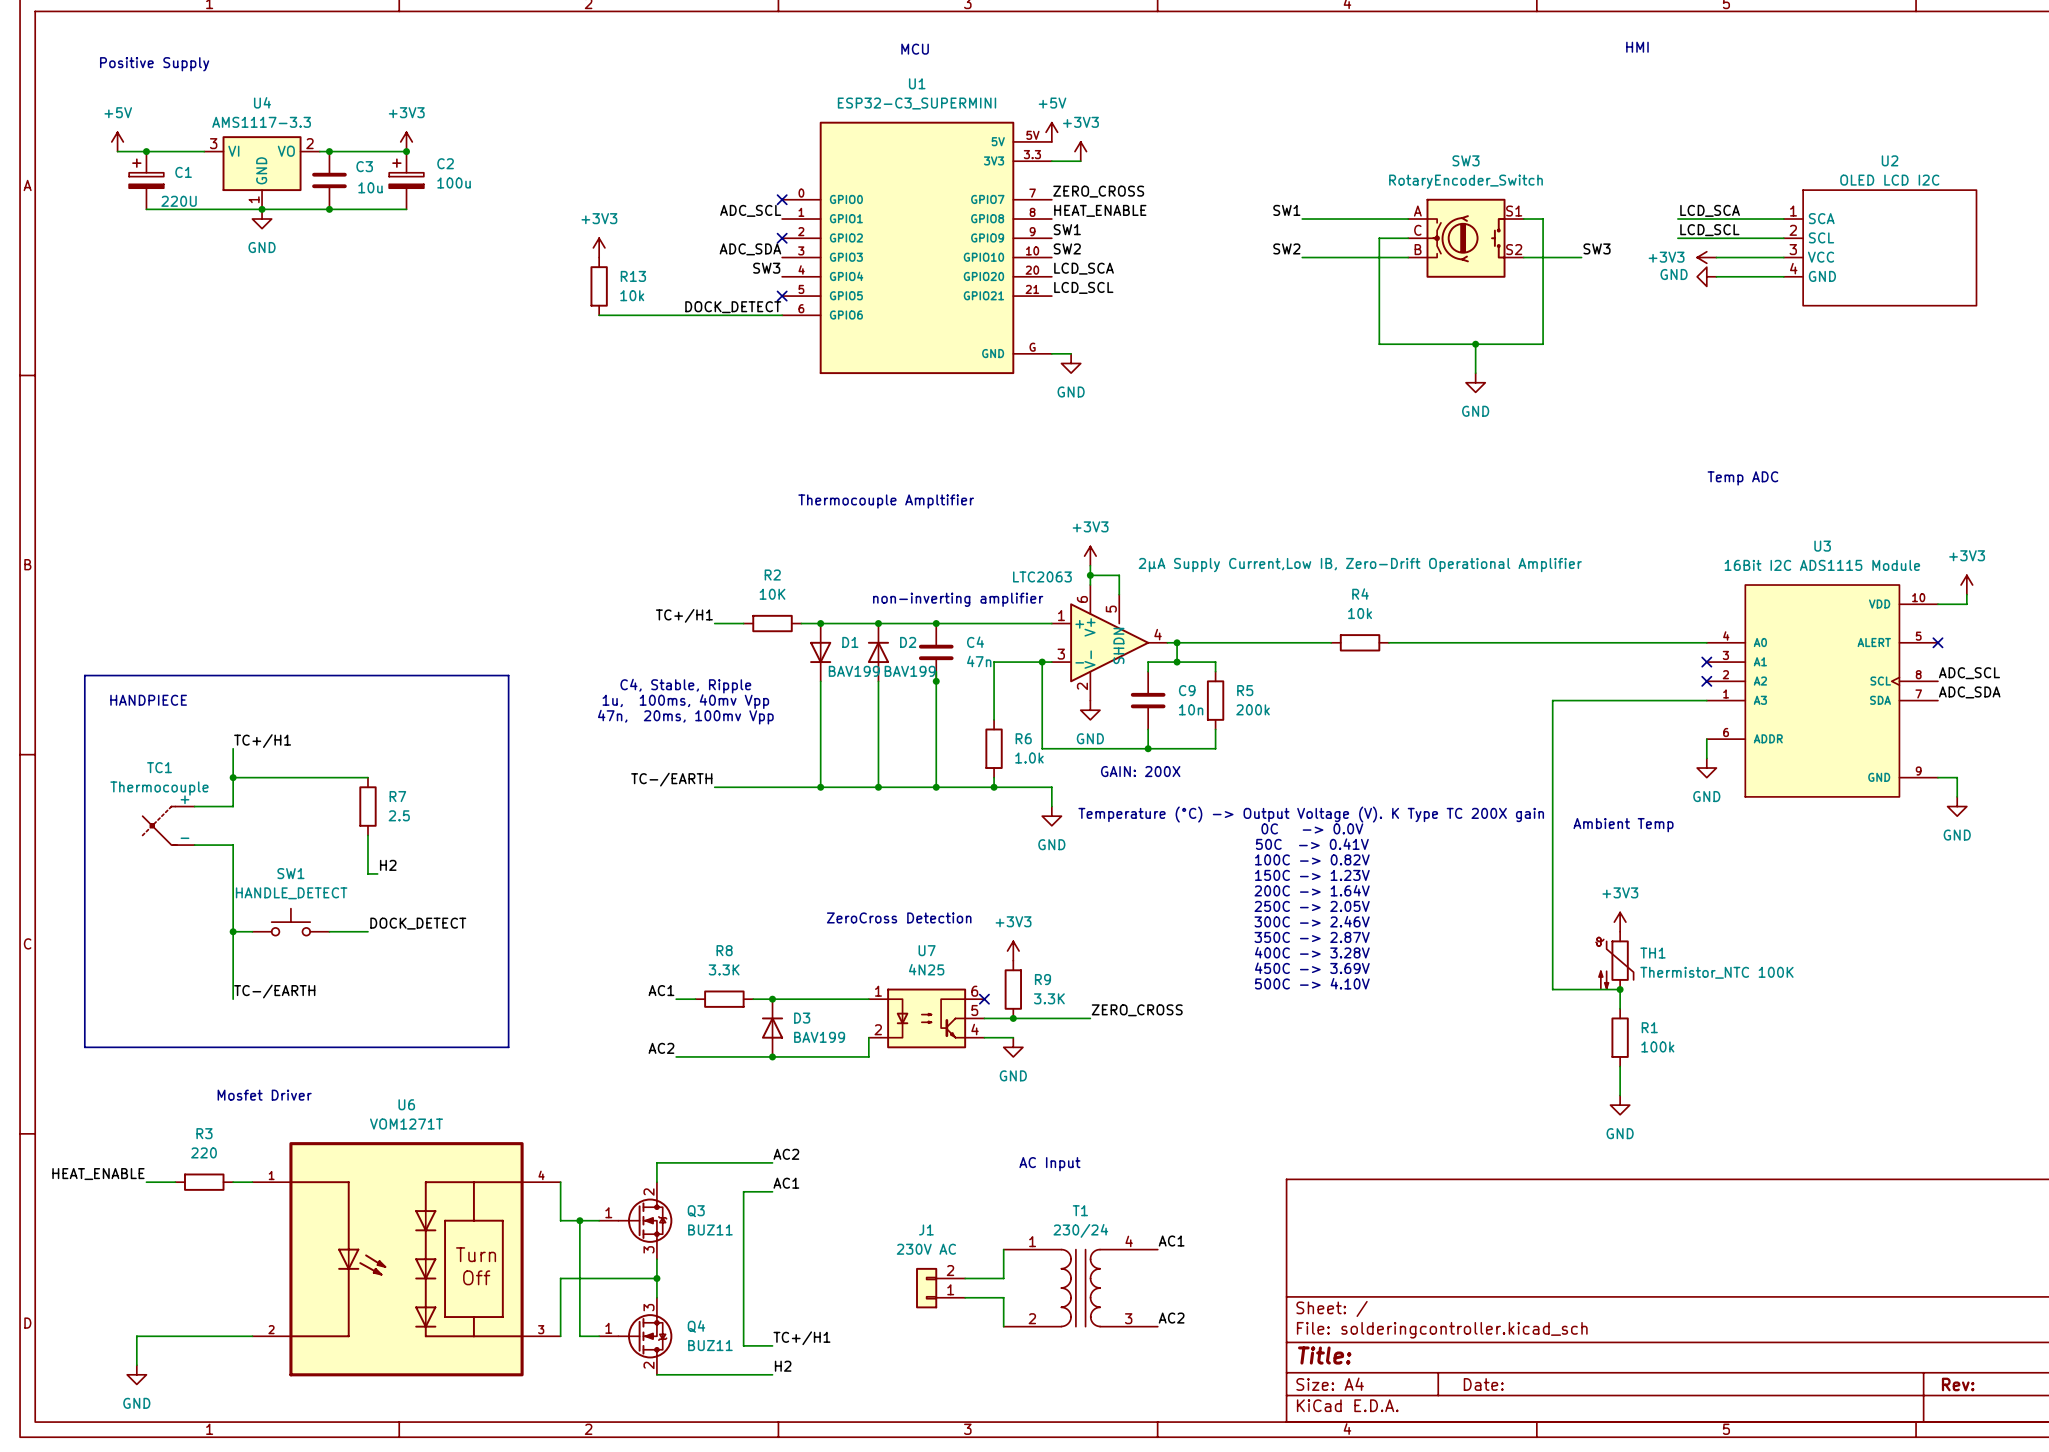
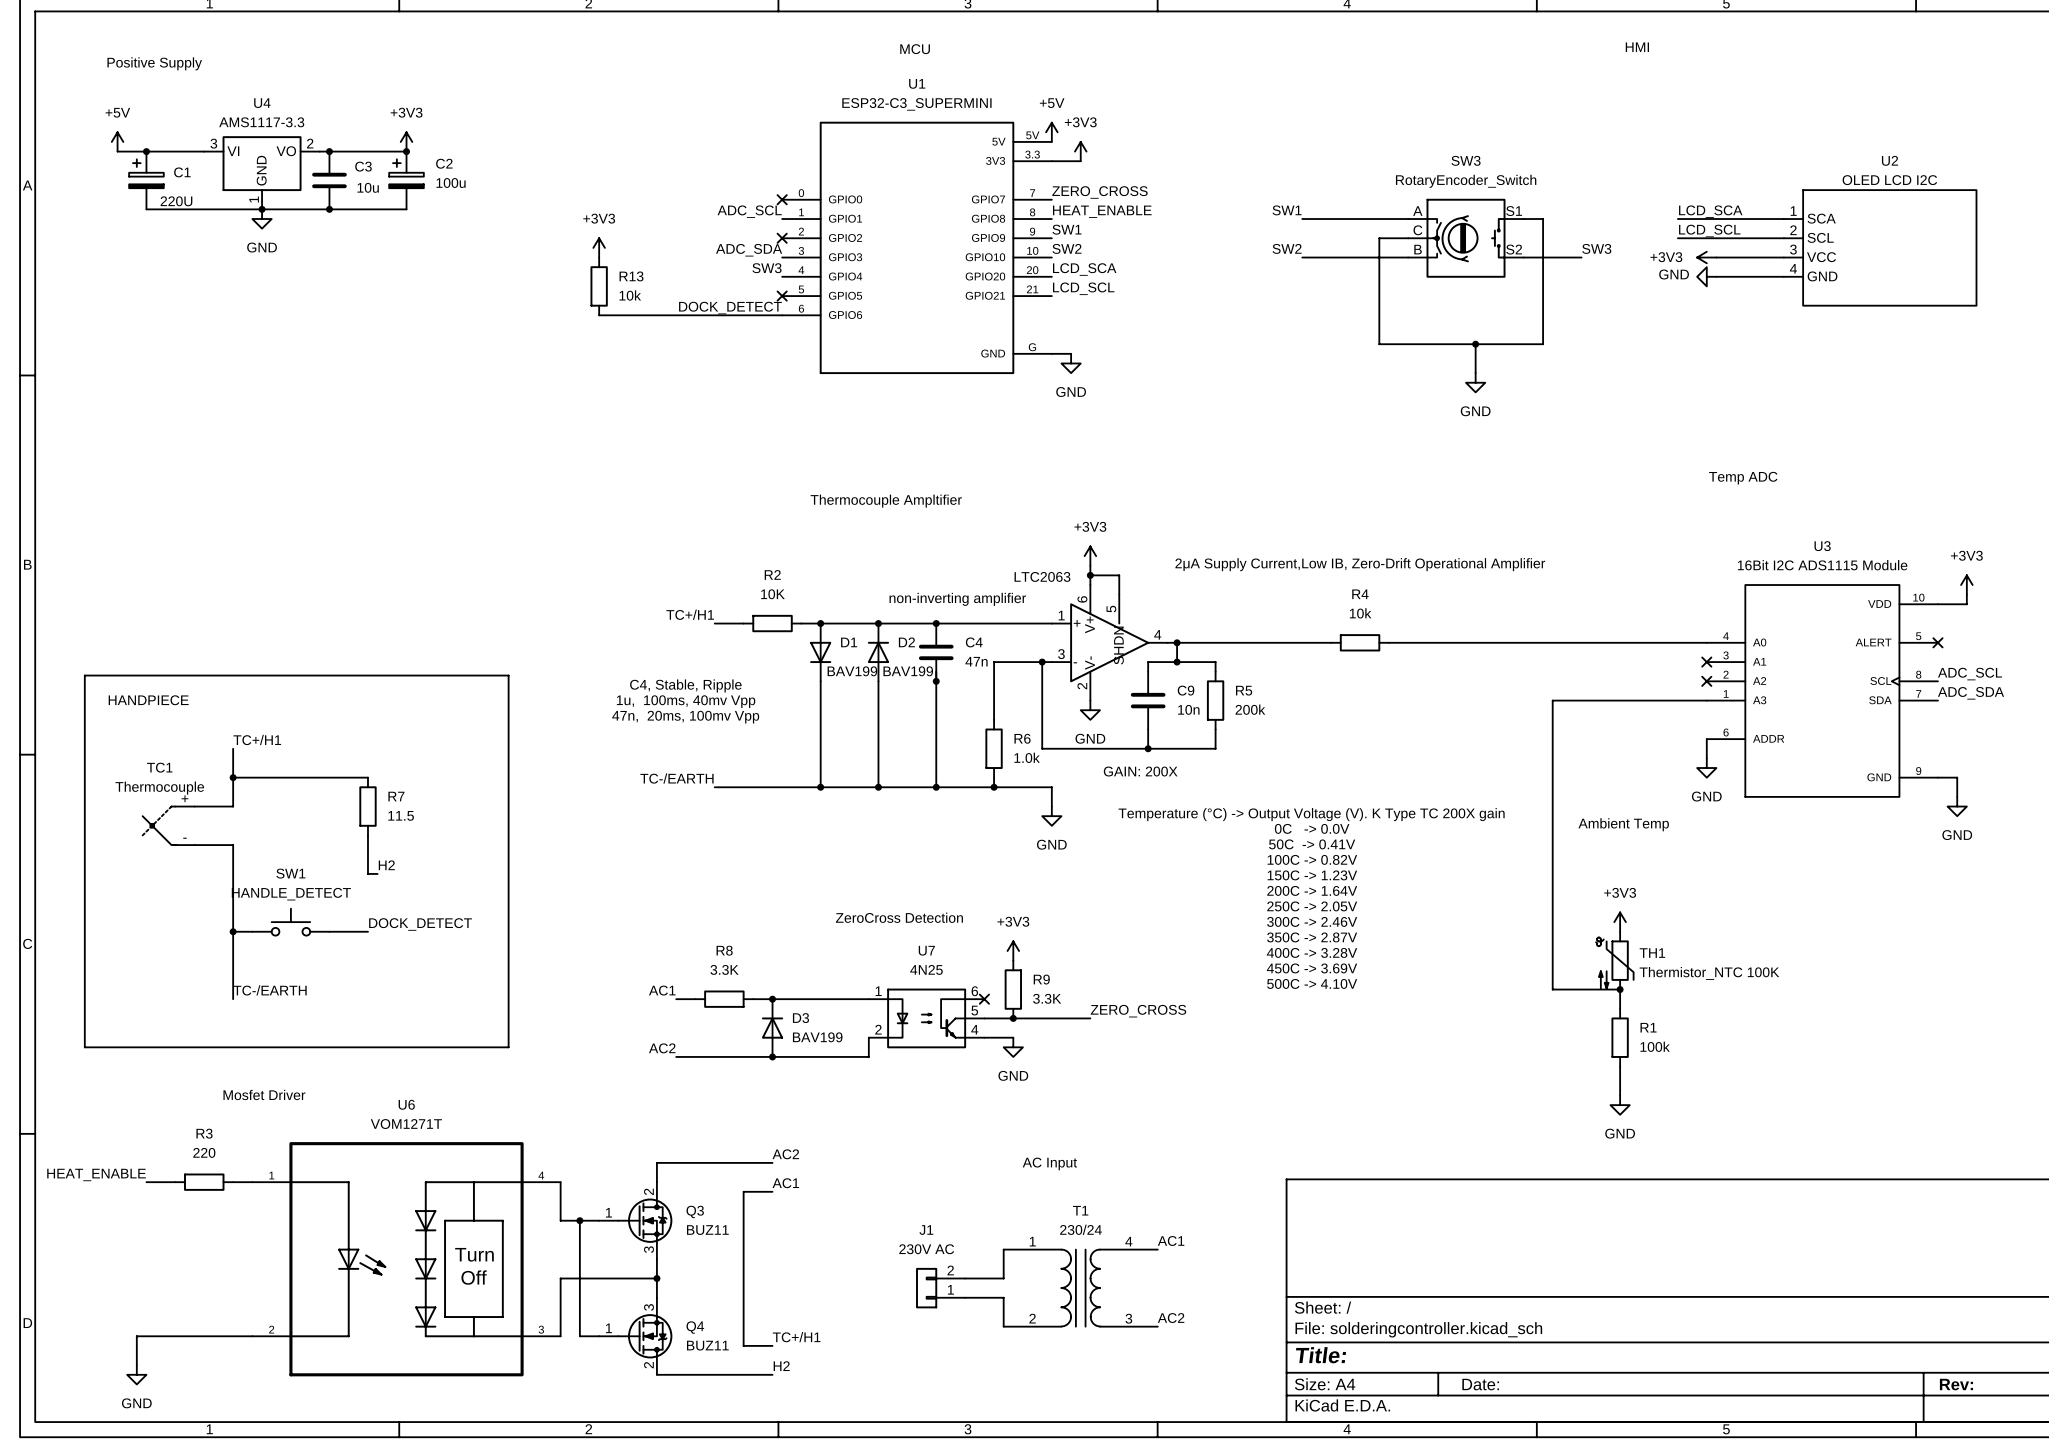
R7 value: 2.5 (399, 815) -> 11.5 (401, 815)

